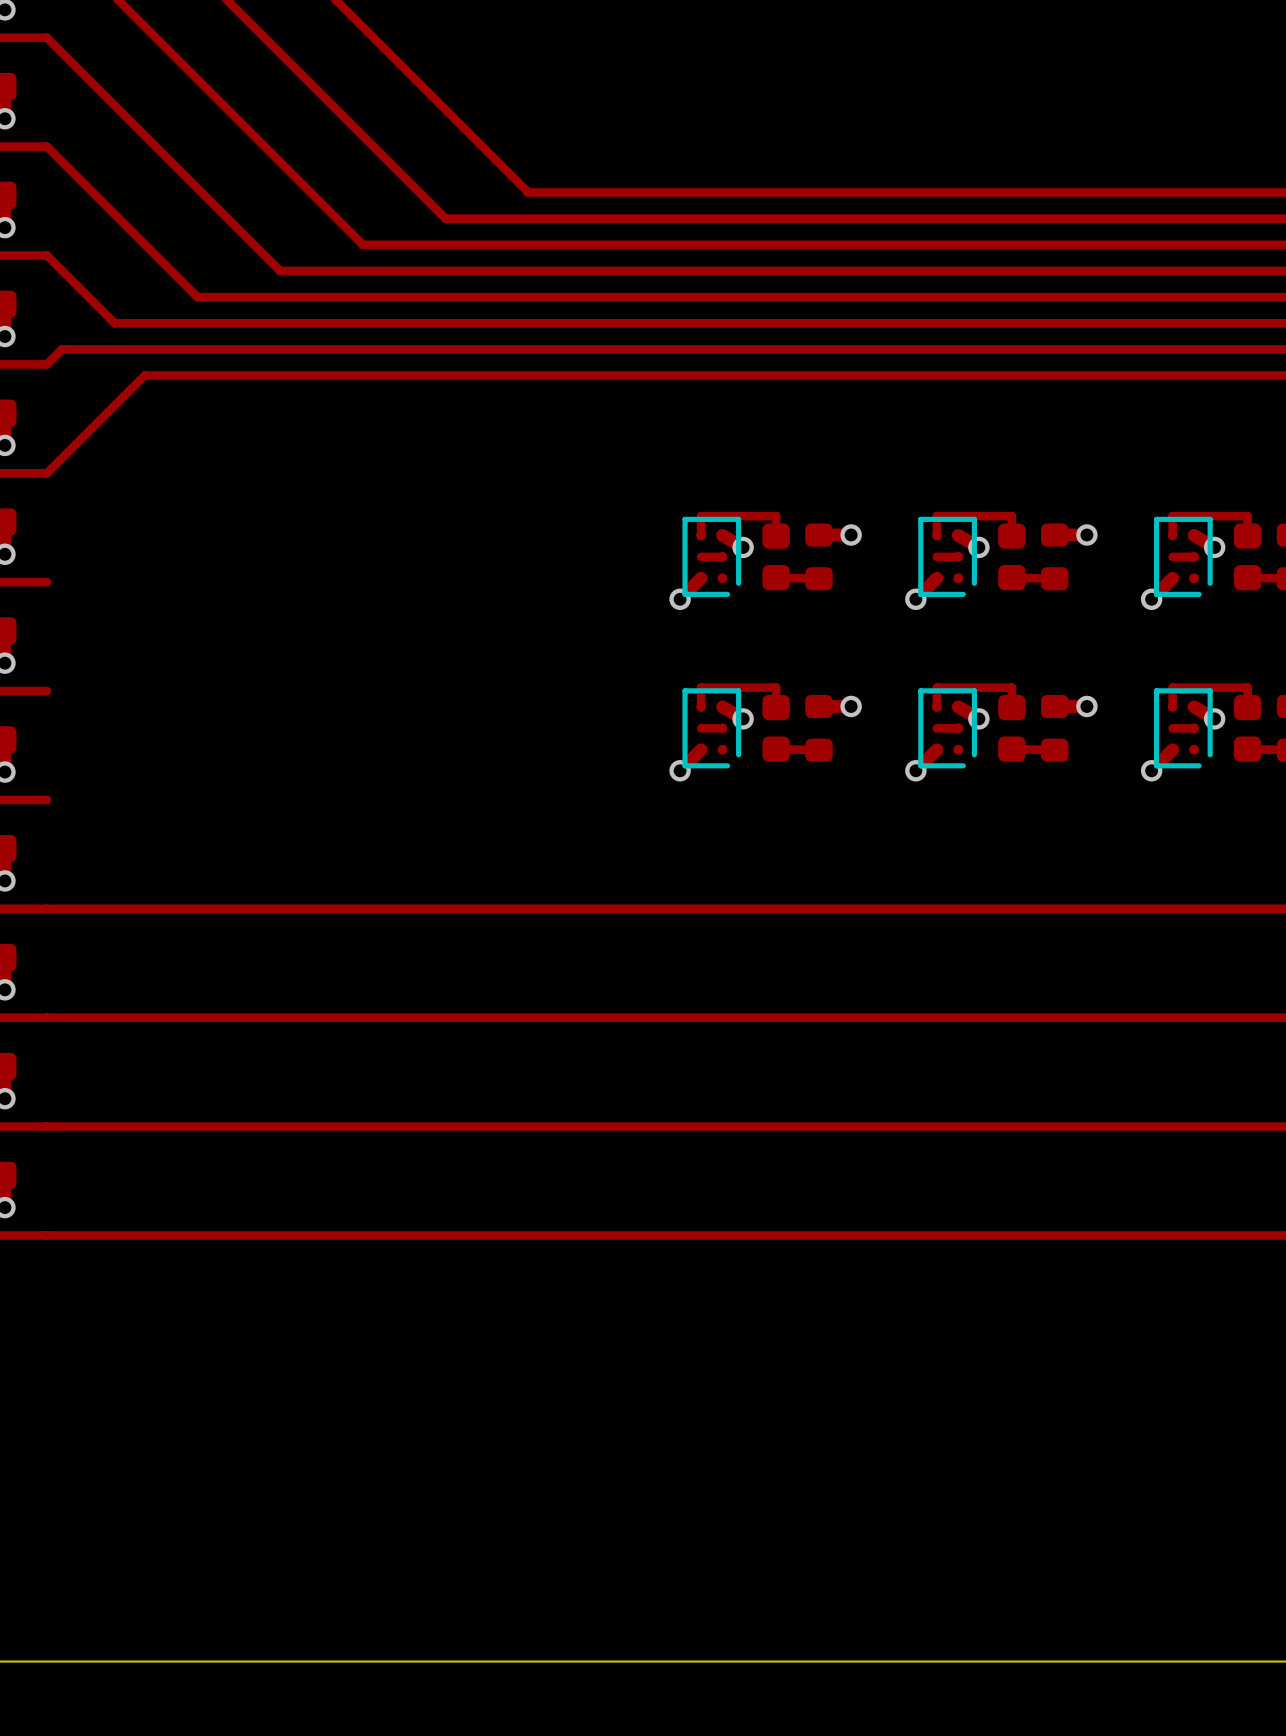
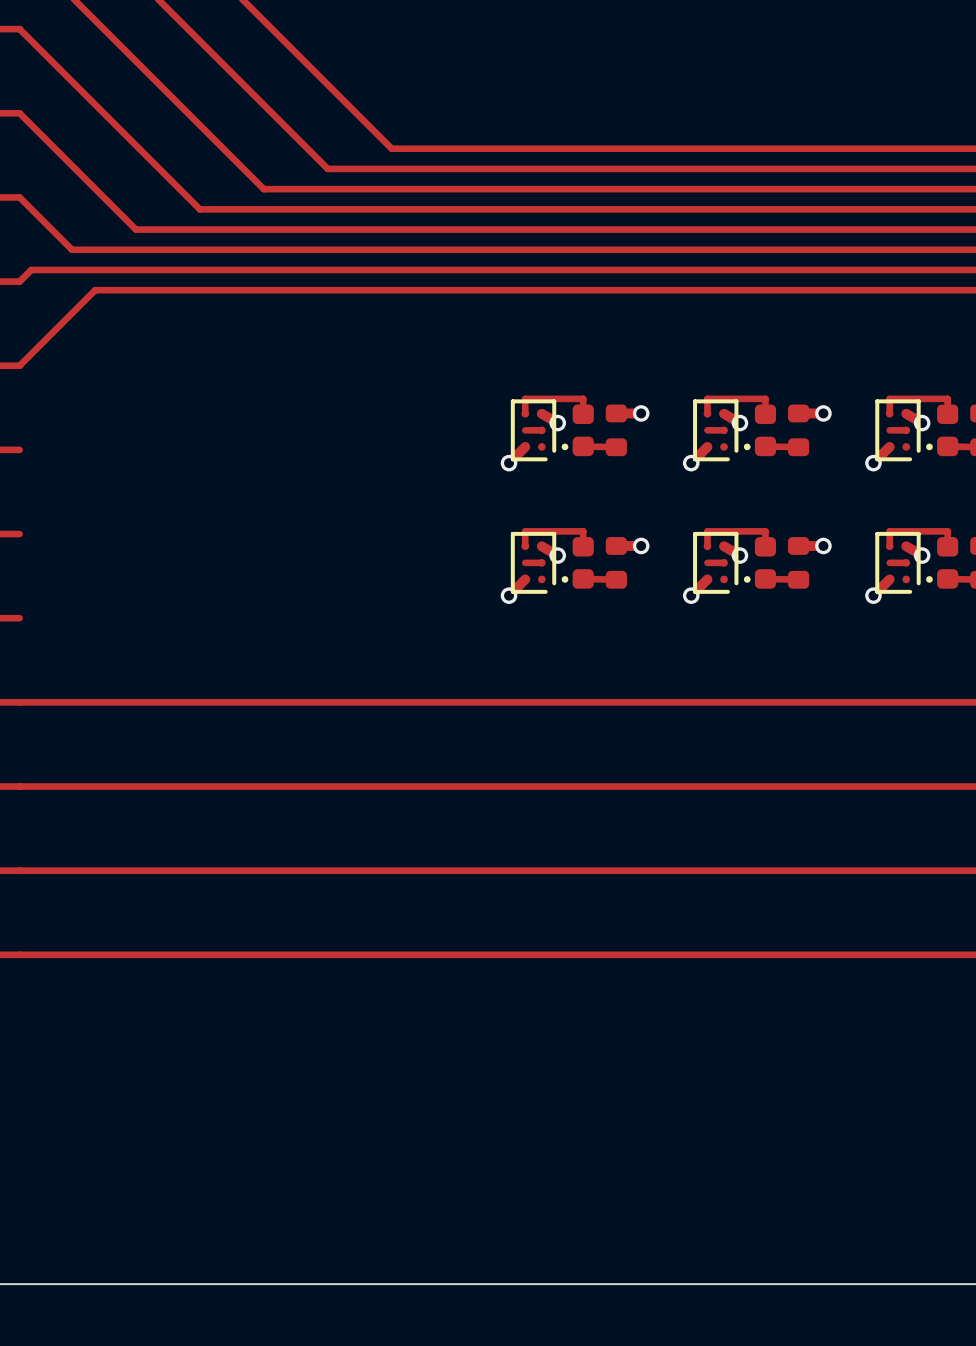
part footprint: [762, 523, 790, 591] -> [561, 404, 594, 457]
part footprint: [998, 523, 1026, 591] -> [743, 404, 777, 457]
part footprint: [1233, 523, 1262, 591] -> [926, 404, 959, 457]
part footprint: [762, 694, 790, 762] -> [561, 537, 594, 589]
part footprint: [998, 694, 1026, 762] -> [743, 537, 777, 589]
part footprint: [1233, 694, 1262, 762] -> [926, 537, 959, 589]

